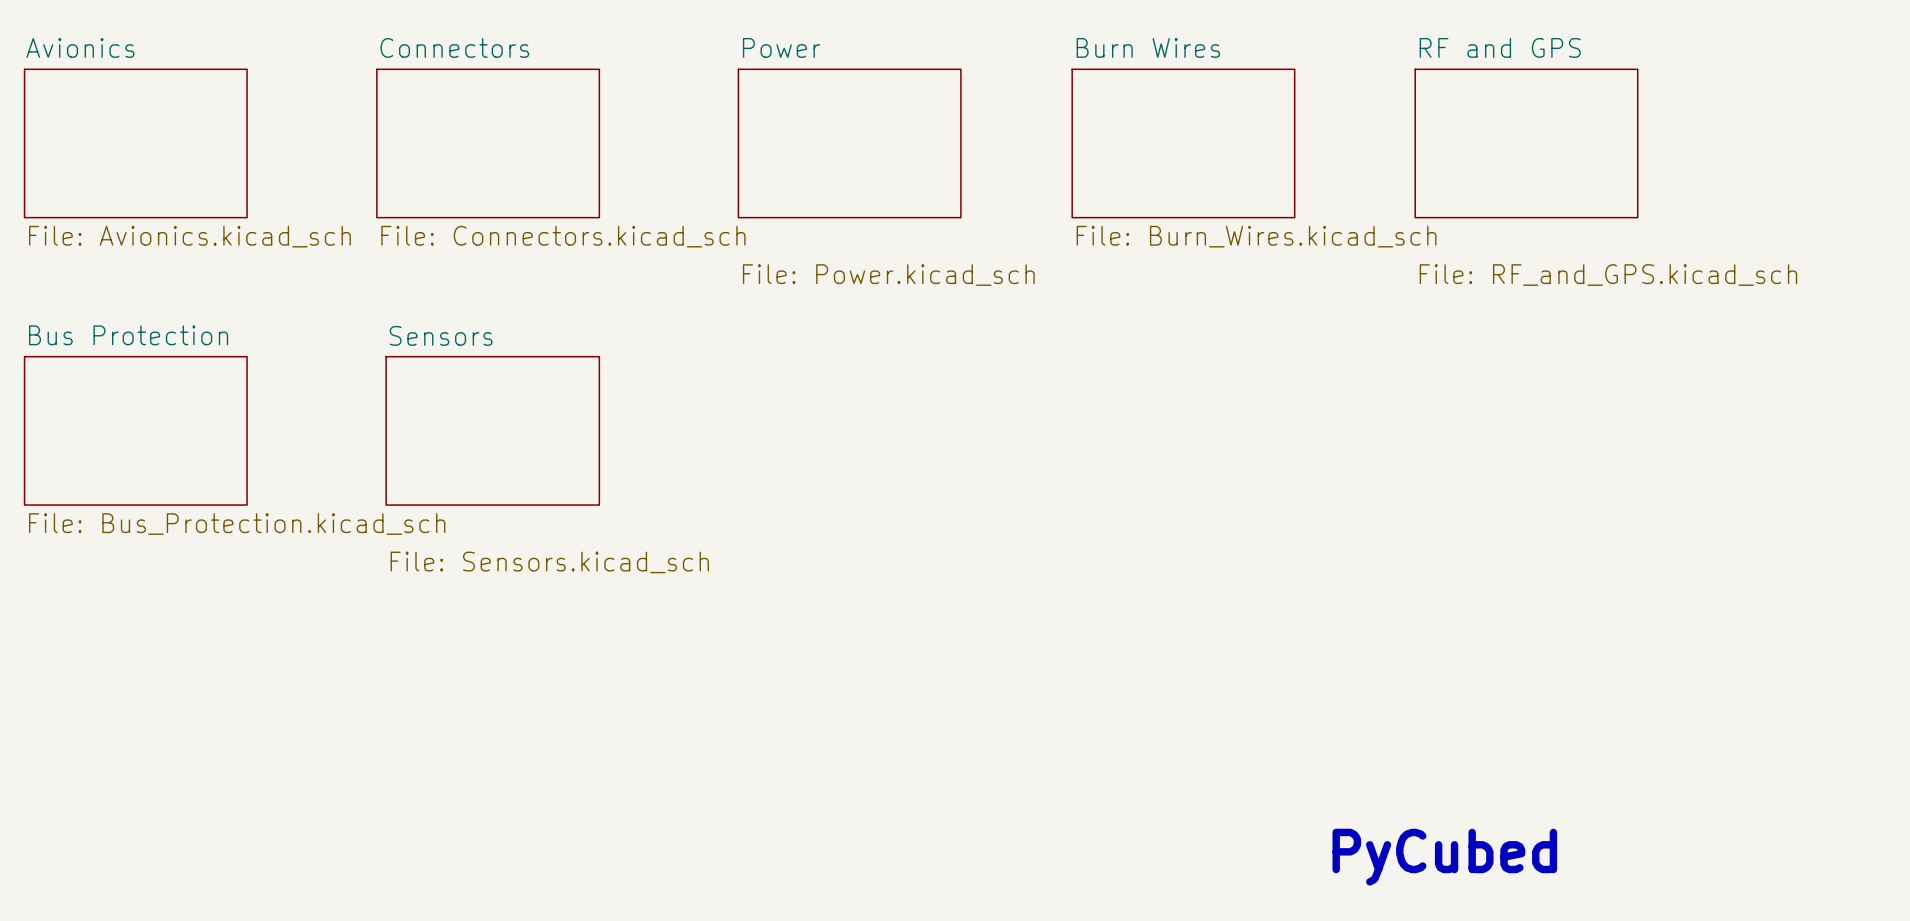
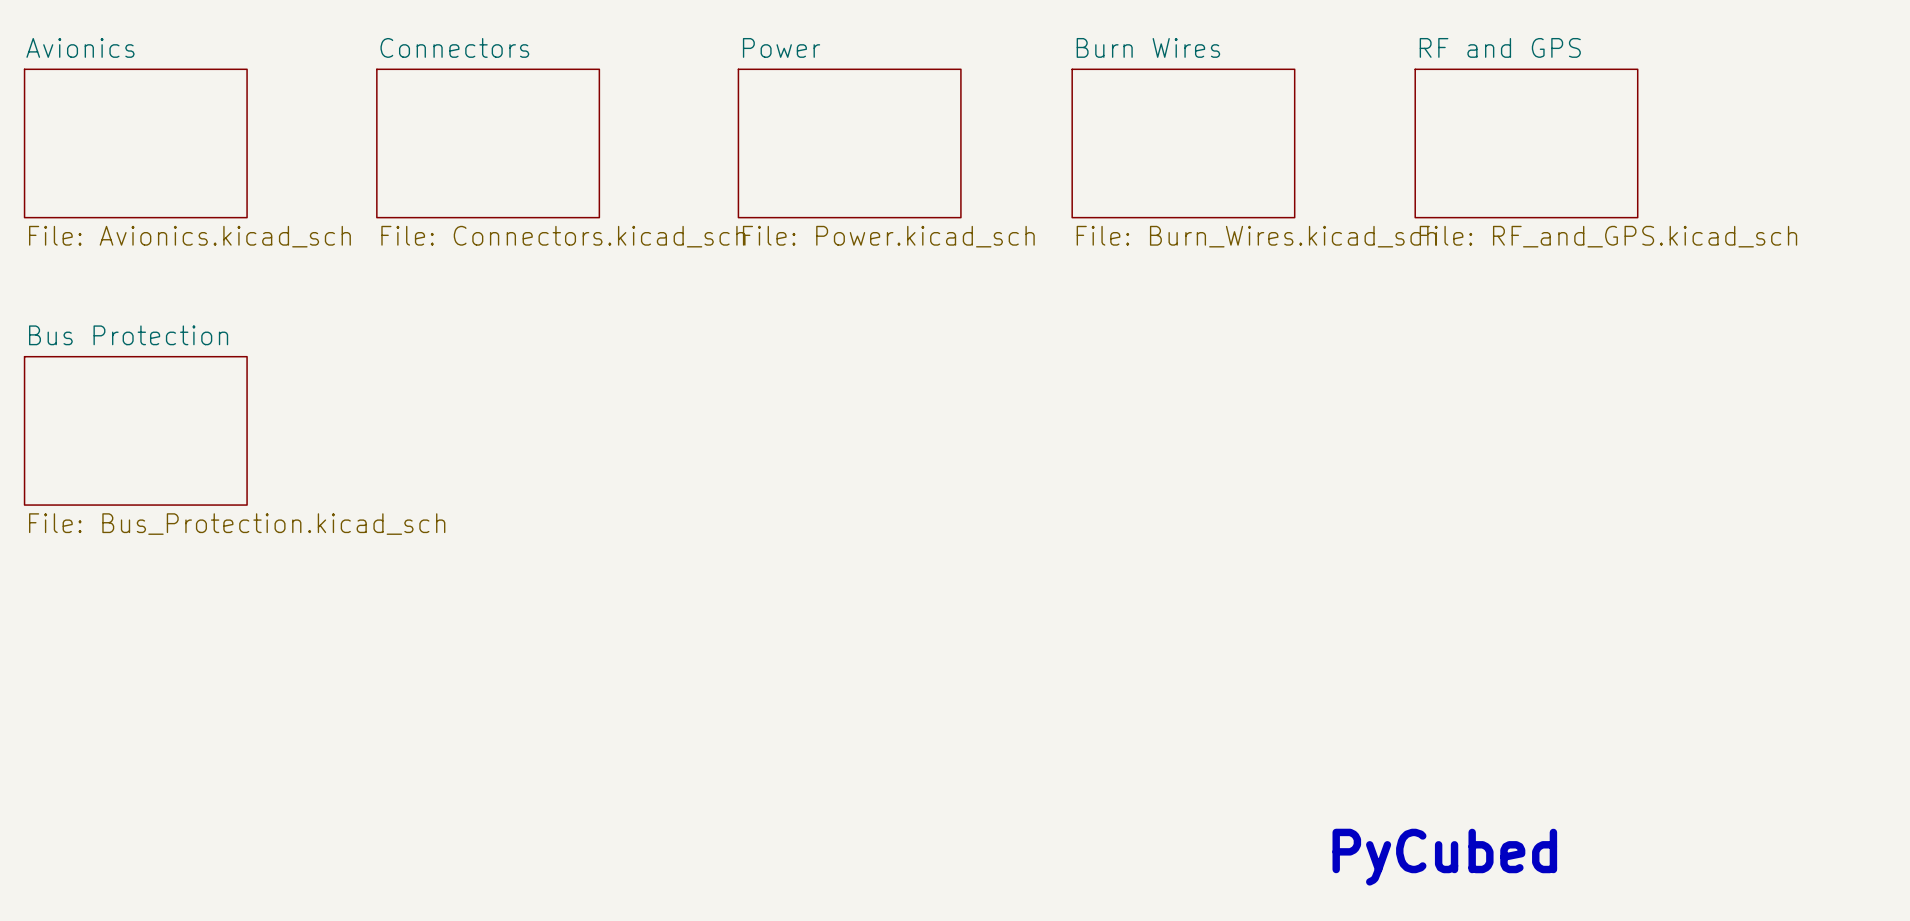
sheet Power value position: File: Power.kicad_sch (888, 275) -> File: Power.kicad_sch (888, 236)
sheet RF and GPS value position: File: RF_and_GPS.kicad_sch (1608, 275) -> File: RF_and_GPS.kicad_sch (1608, 236)
sheet Sensors: File: Sensors.kicad_sch (492, 430) -> none

